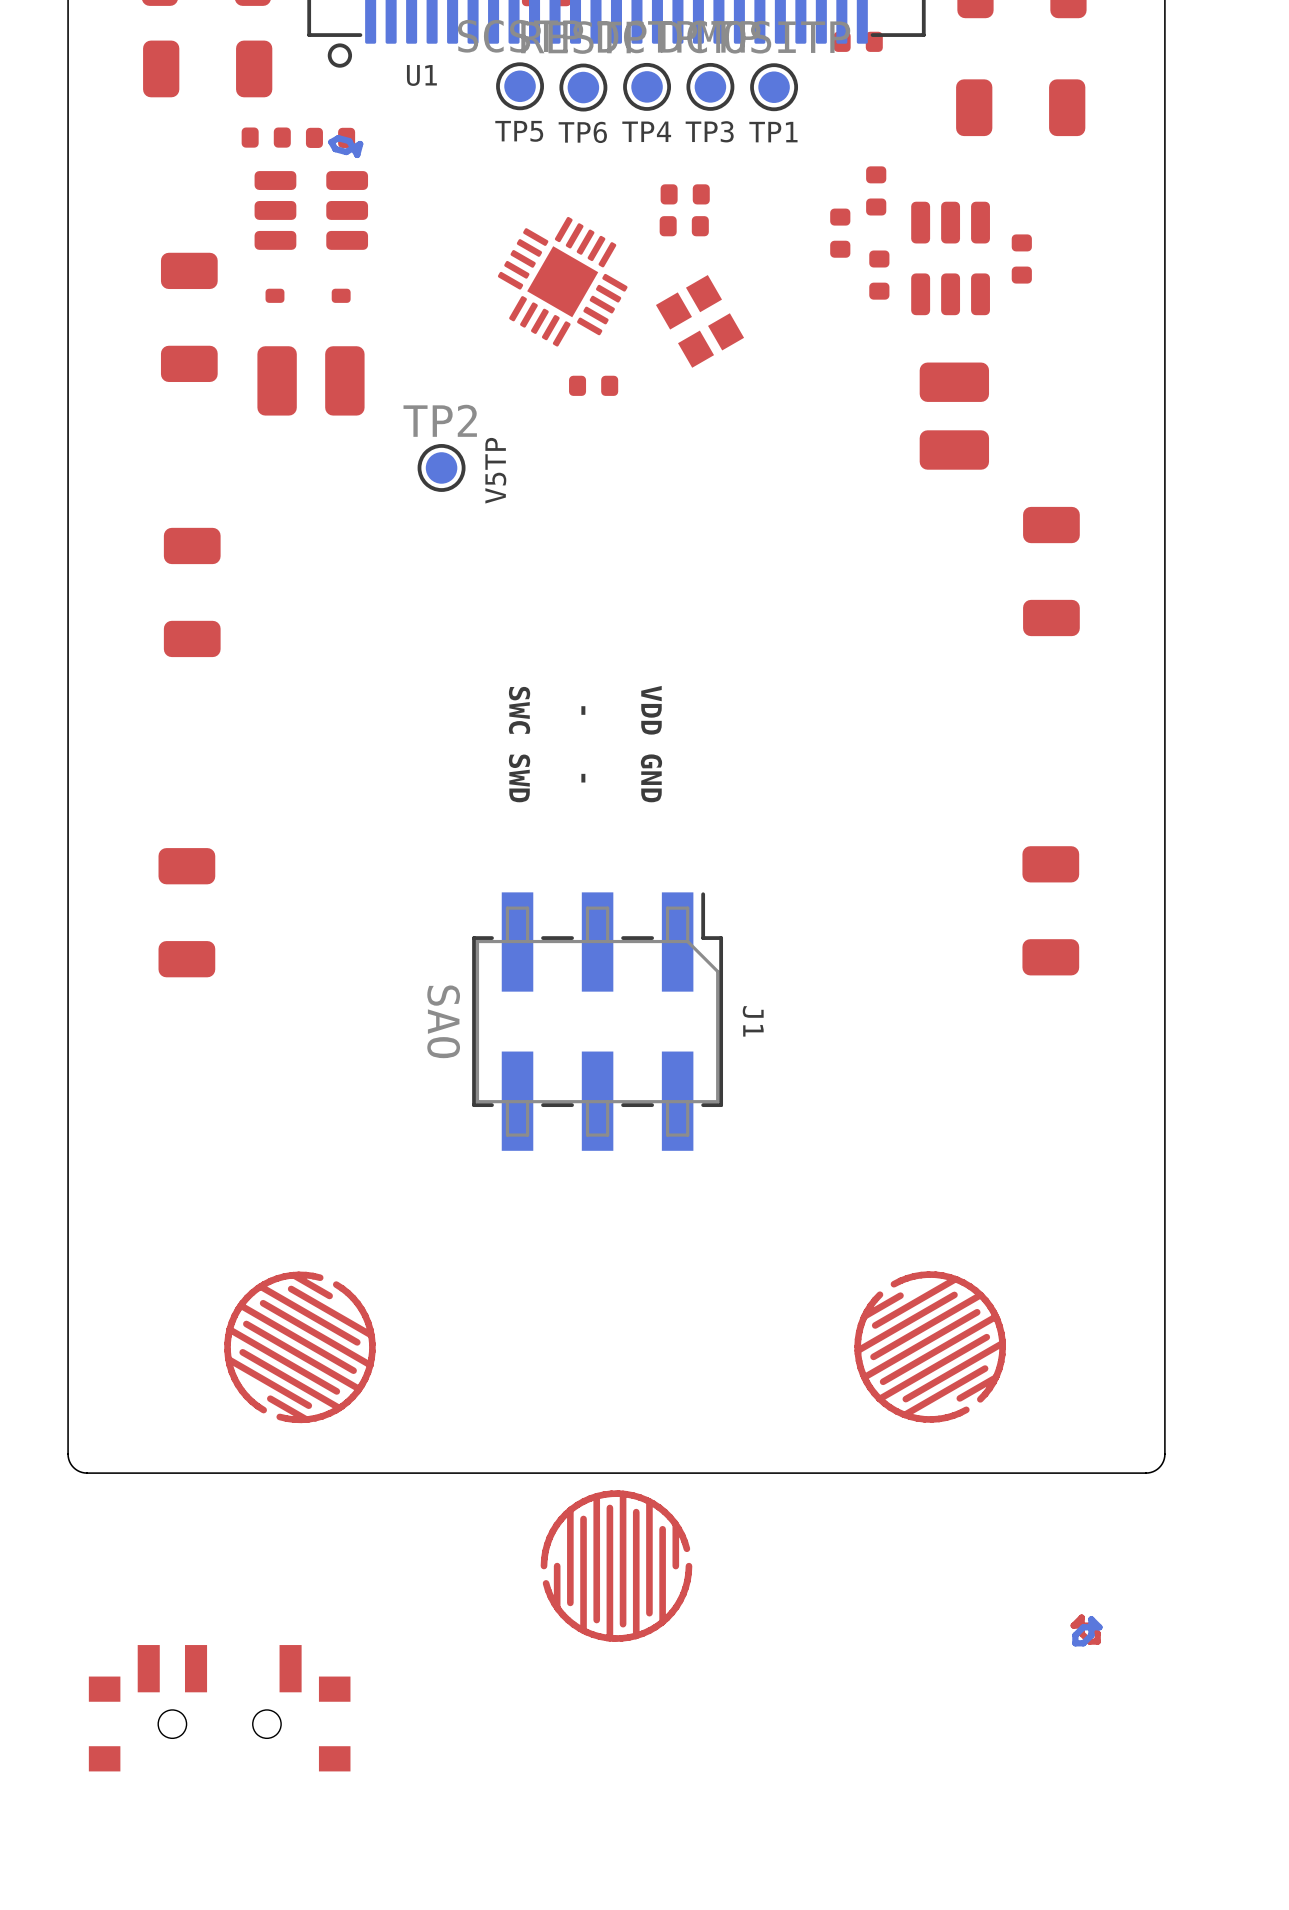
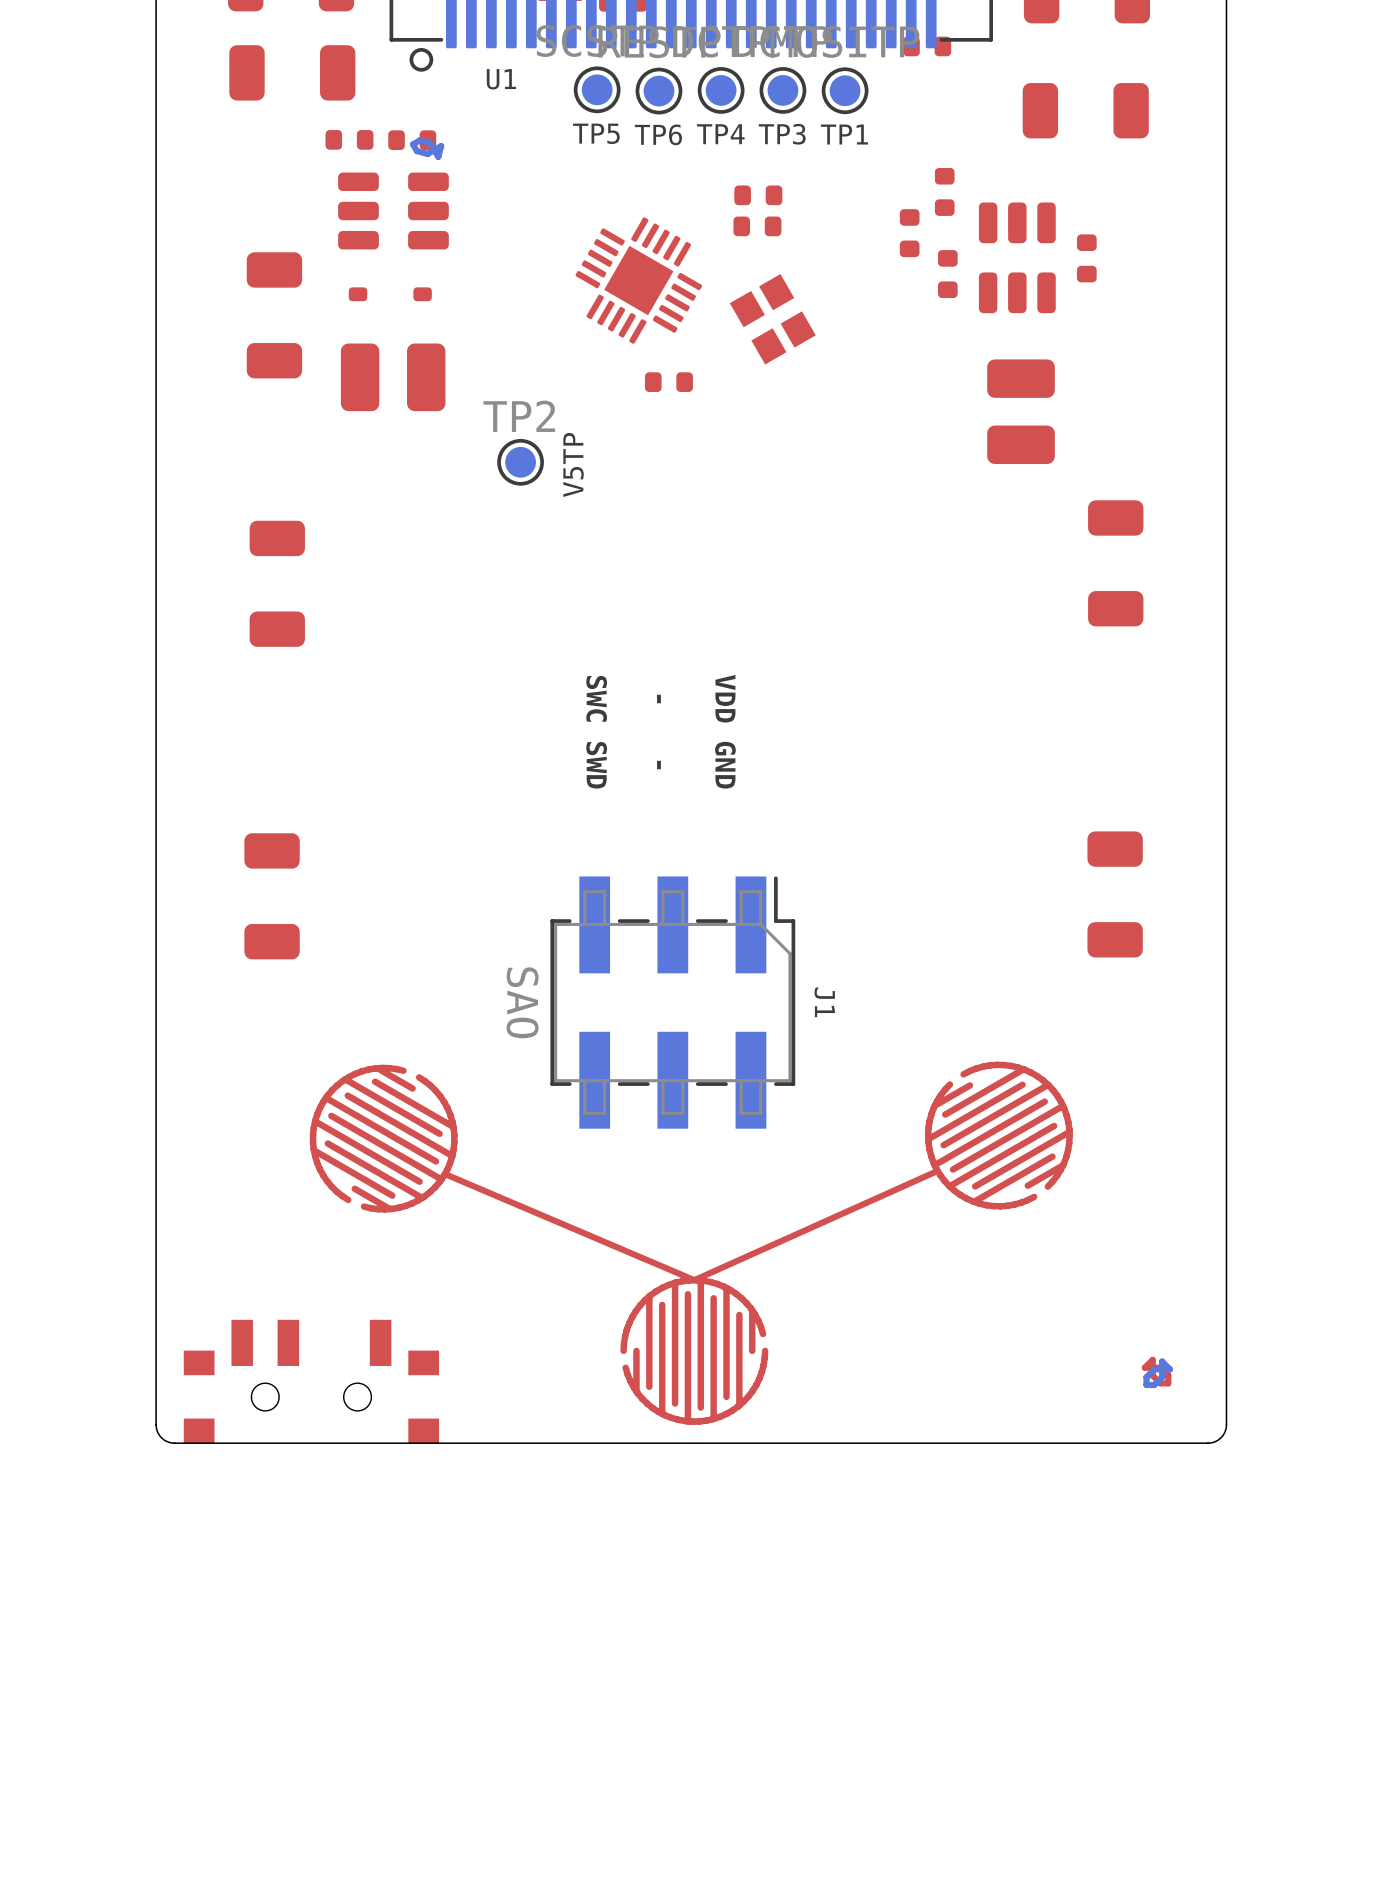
top track: none -> (937, 1170) (694, 1280) (444, 1174)
part position: (299, 1347) -> (383, 1138)
part position: (930, 1347) -> (998, 1135)
part position: (616, 1566) -> (694, 1350)
top track: (1081, 1617) (1073, 1625) (1089, 1625) (1097, 1633) (1097, 1641) (1089, 1641) (1081, 1633) (1081, 1617) -> (1152, 1359) (1144, 1367) (1160, 1367) (1168, 1375) (1168, 1383) (1160, 1383) (1152, 1375) (1152, 1359)
bottom track: (1091, 1619) (1091, 1635) (1083, 1643) (1075, 1643) (1075, 1635) (1083, 1627) (1099, 1627) (1091, 1619) -> (1162, 1361) (1162, 1377) (1154, 1384) (1146, 1384) (1146, 1377) (1154, 1369) (1169, 1369) (1162, 1361)
part position: (219, 1708) -> (311, 1381)

